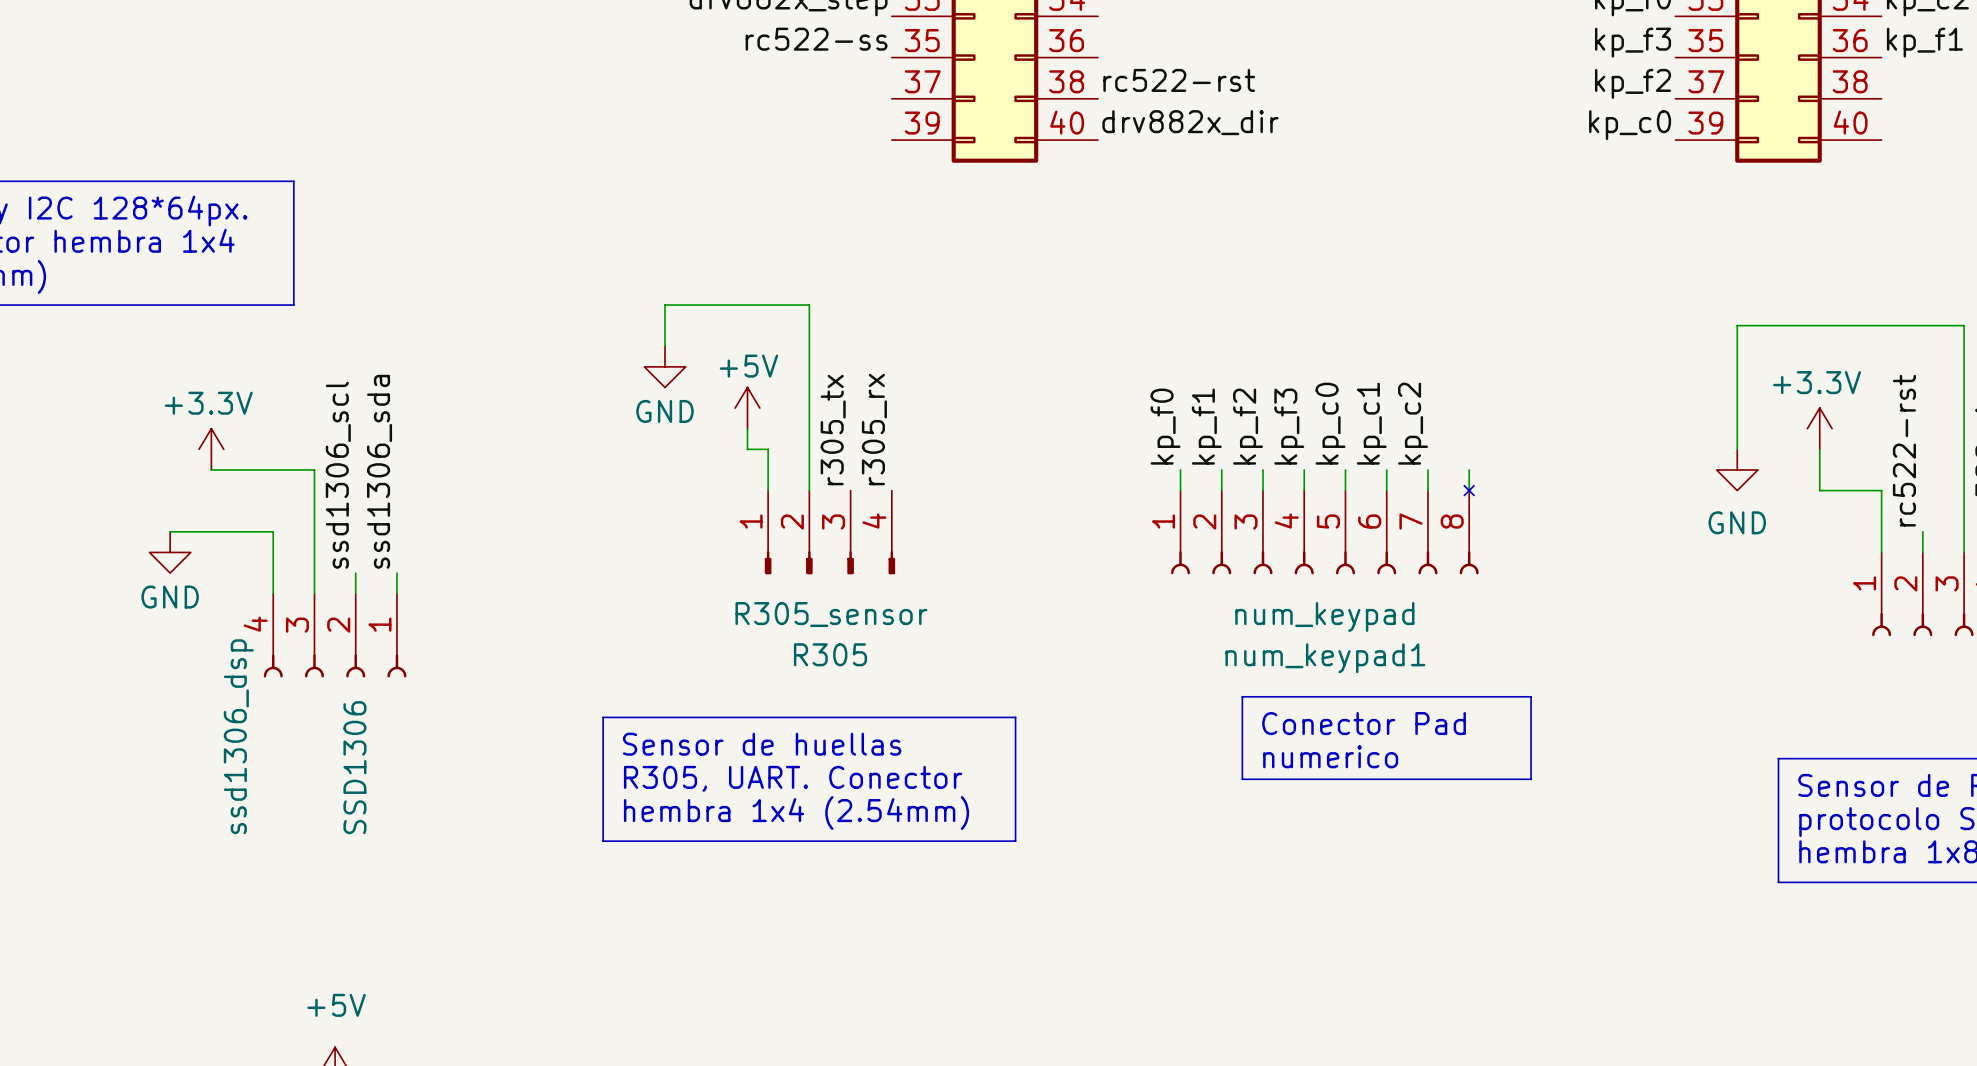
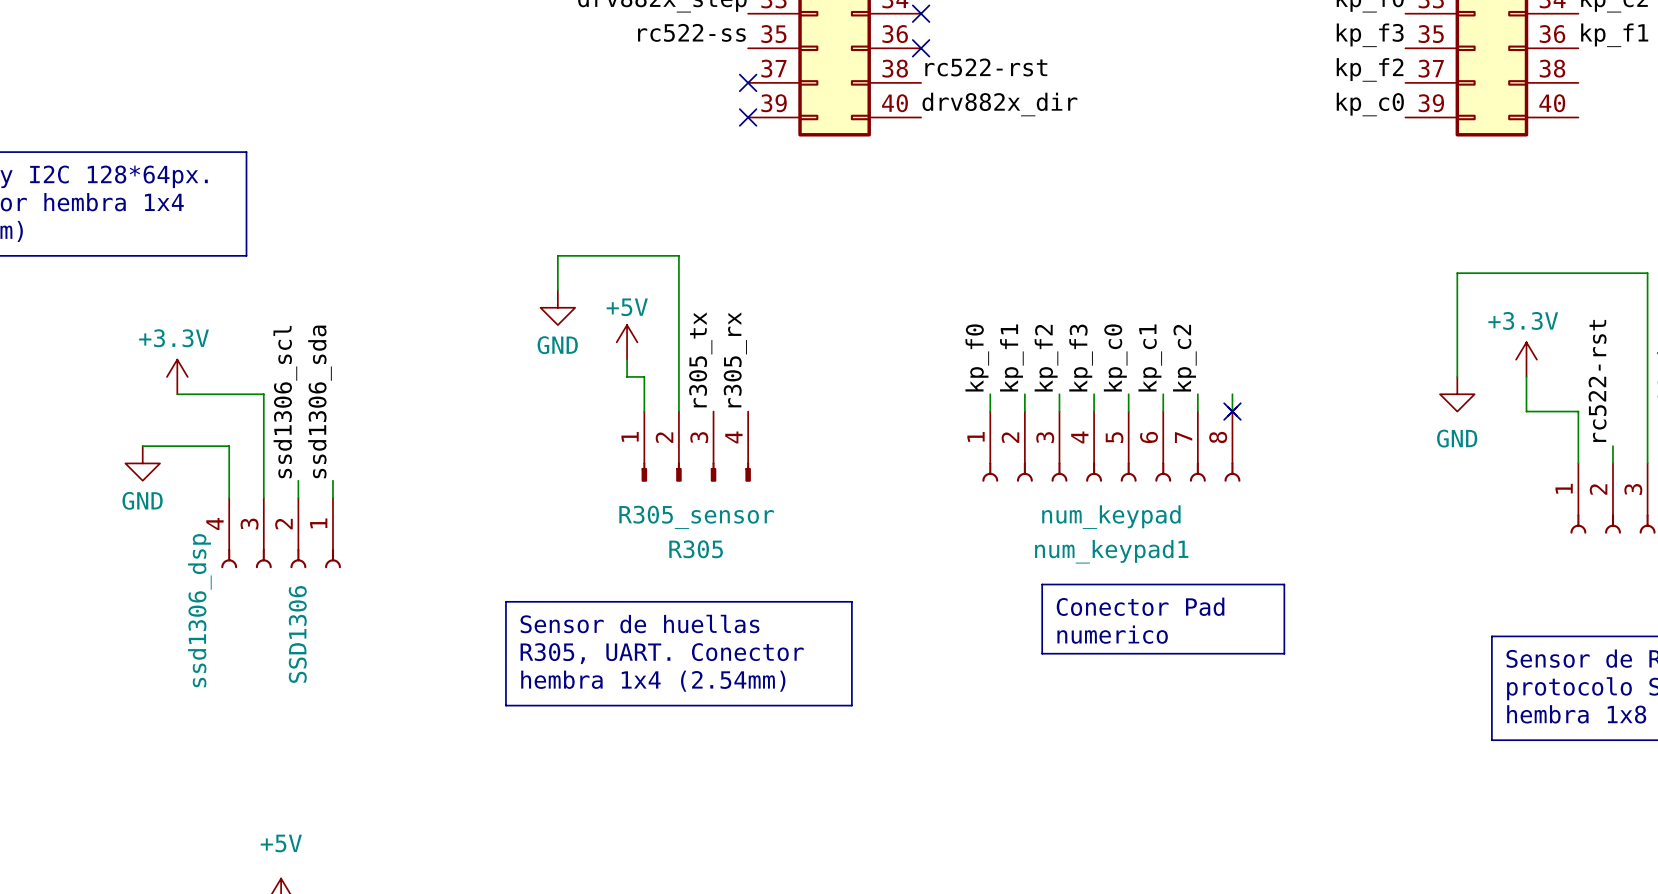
no-connect mark: none -> (921, 13)
no-connect mark: none -> (921, 48)
no-connect mark: none -> (748, 82)
no-connect mark: none -> (748, 117)
no-connect mark: none -> (1232, 411)

